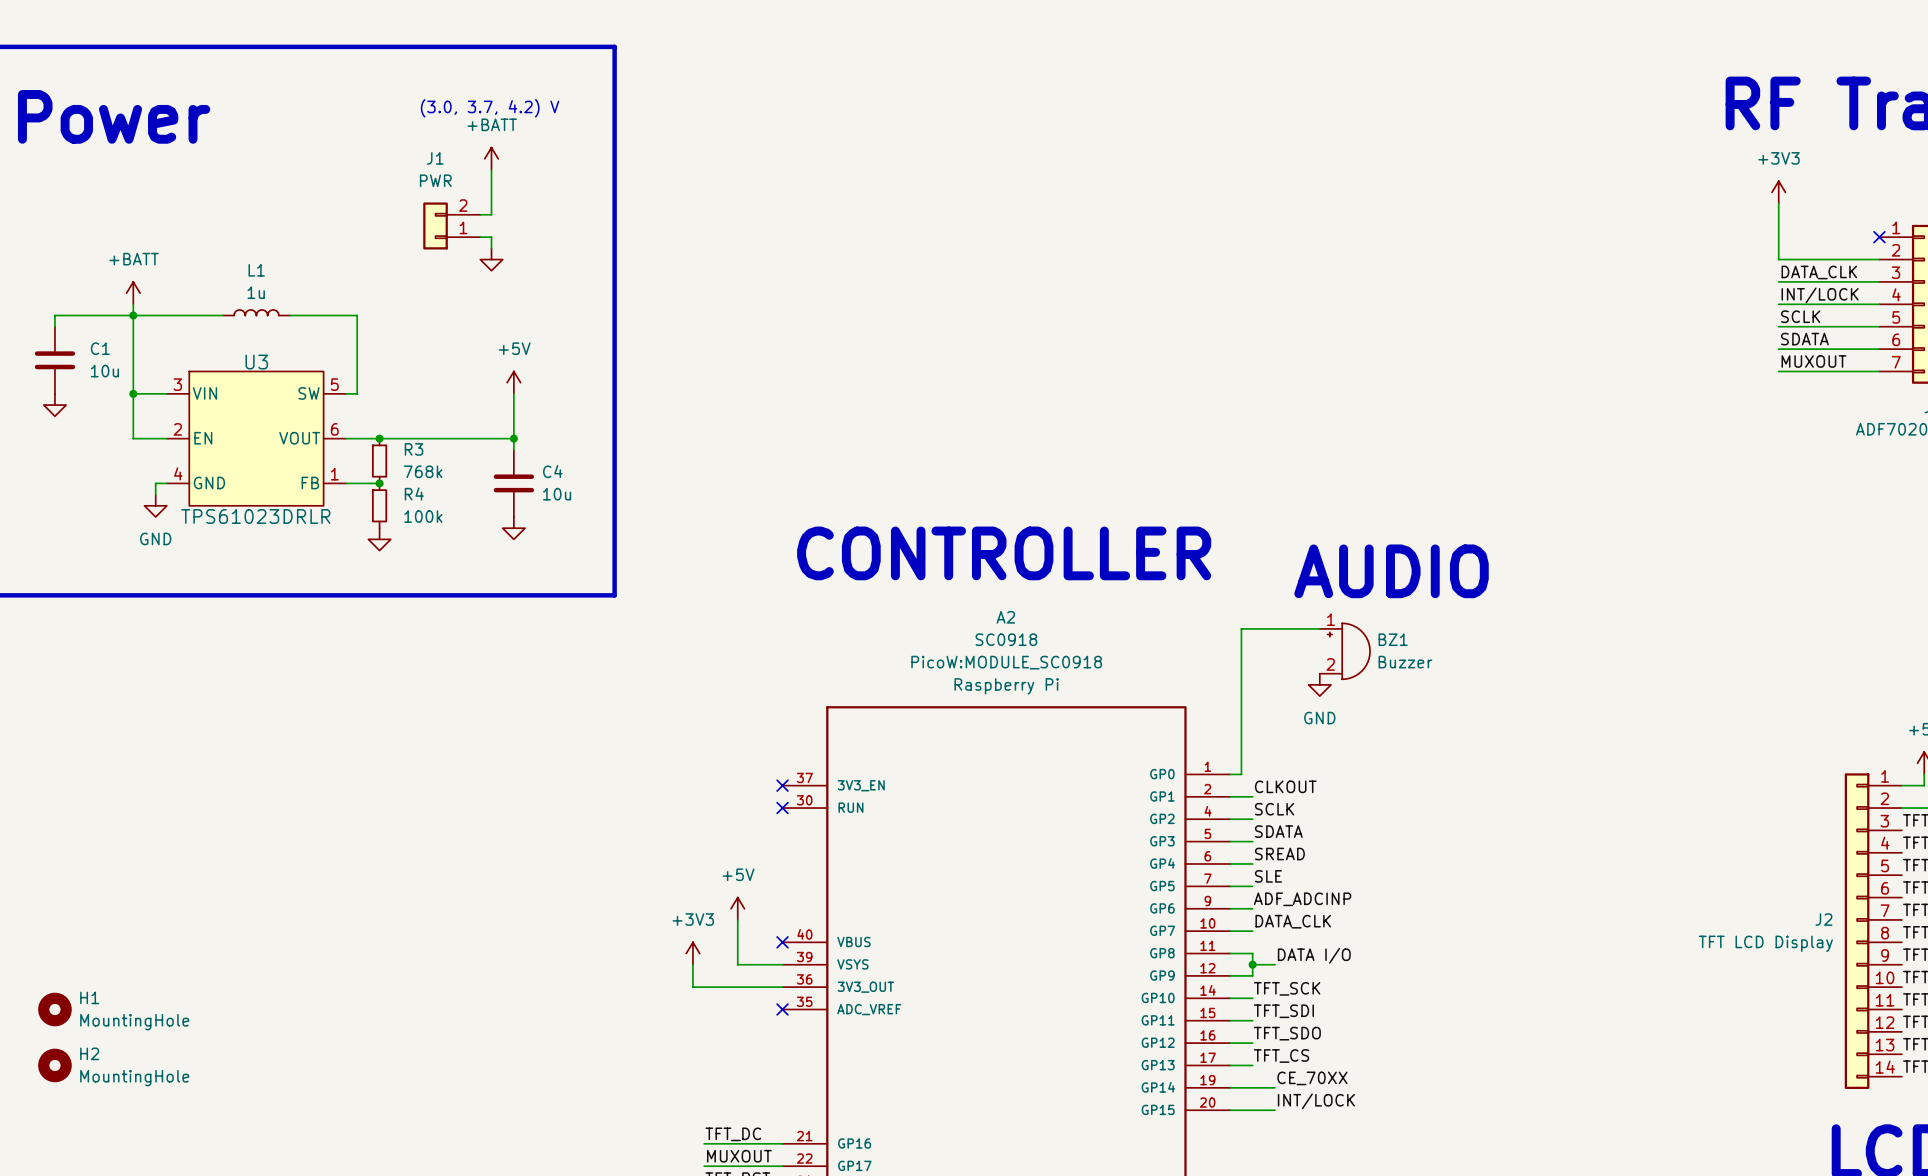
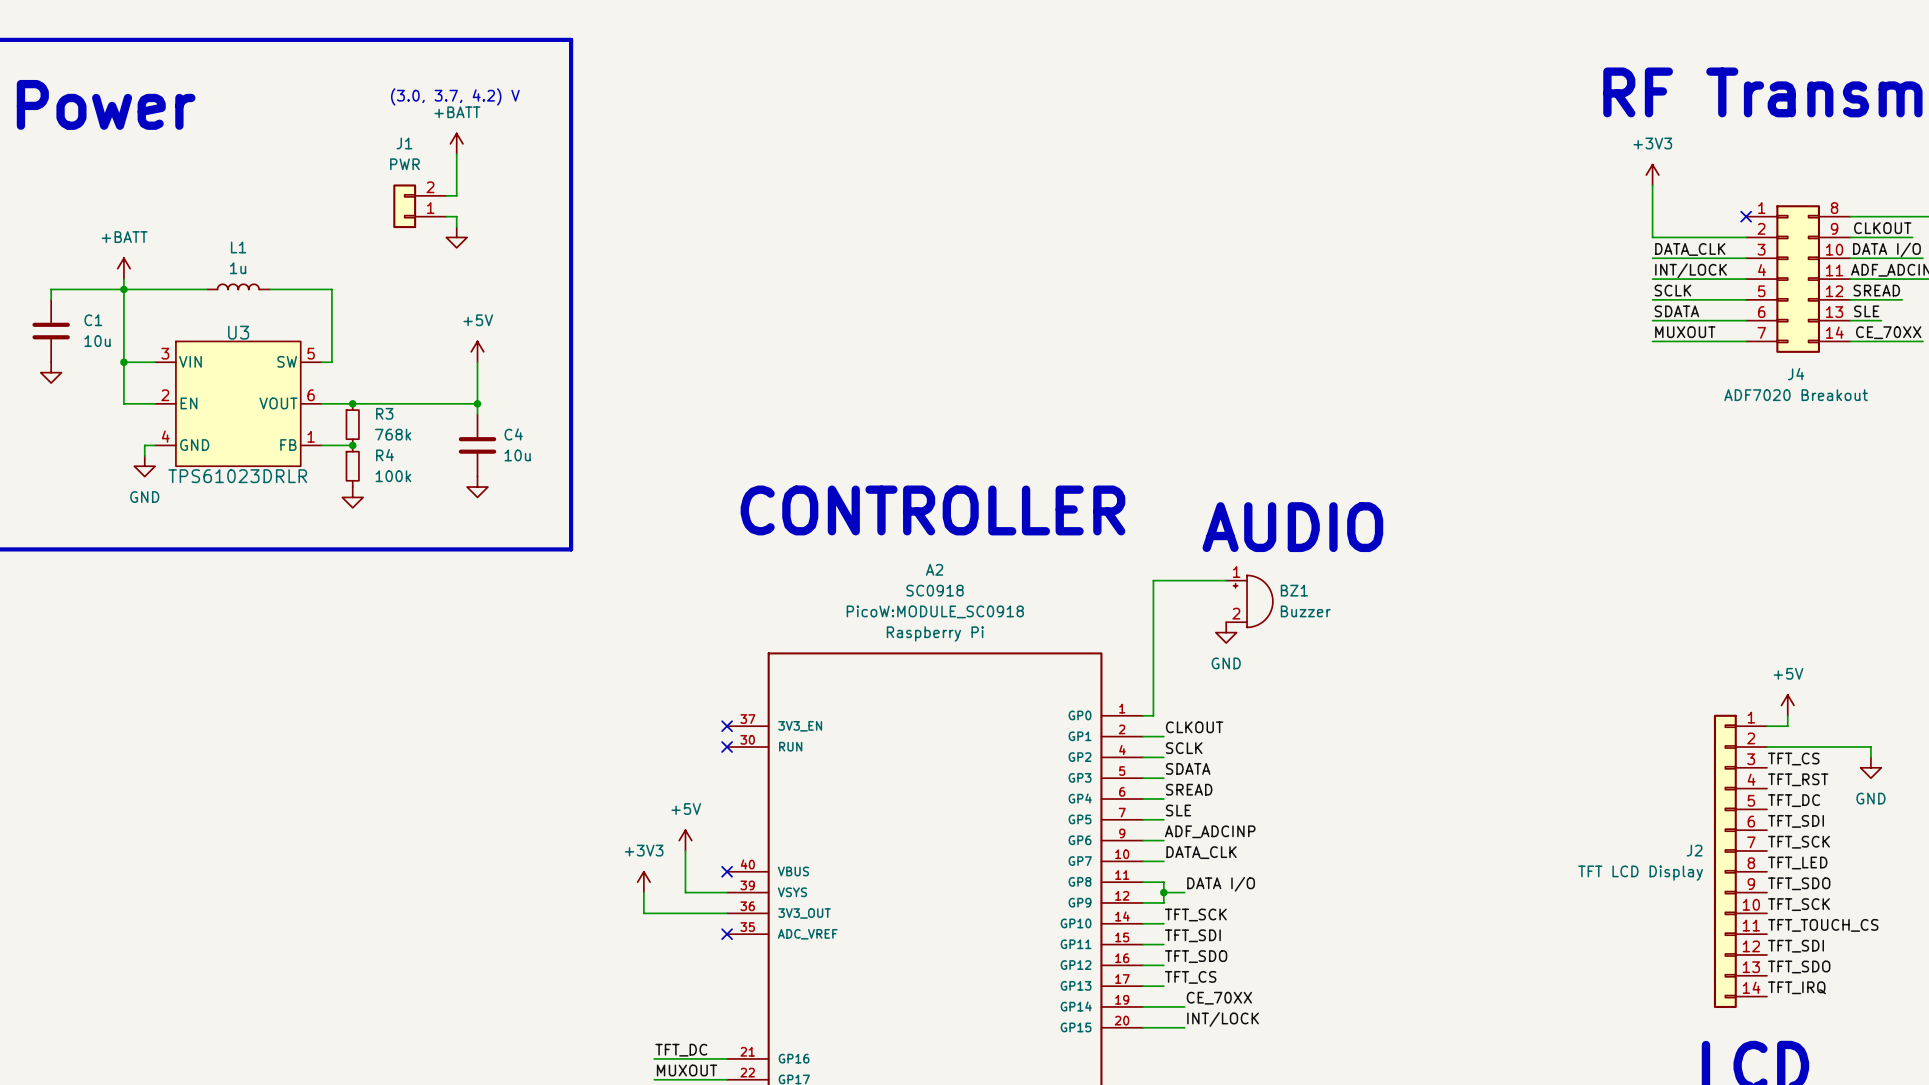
H1: MountingHole (54, 1009) -> none
H2: MountingHole (54, 1065) -> none

